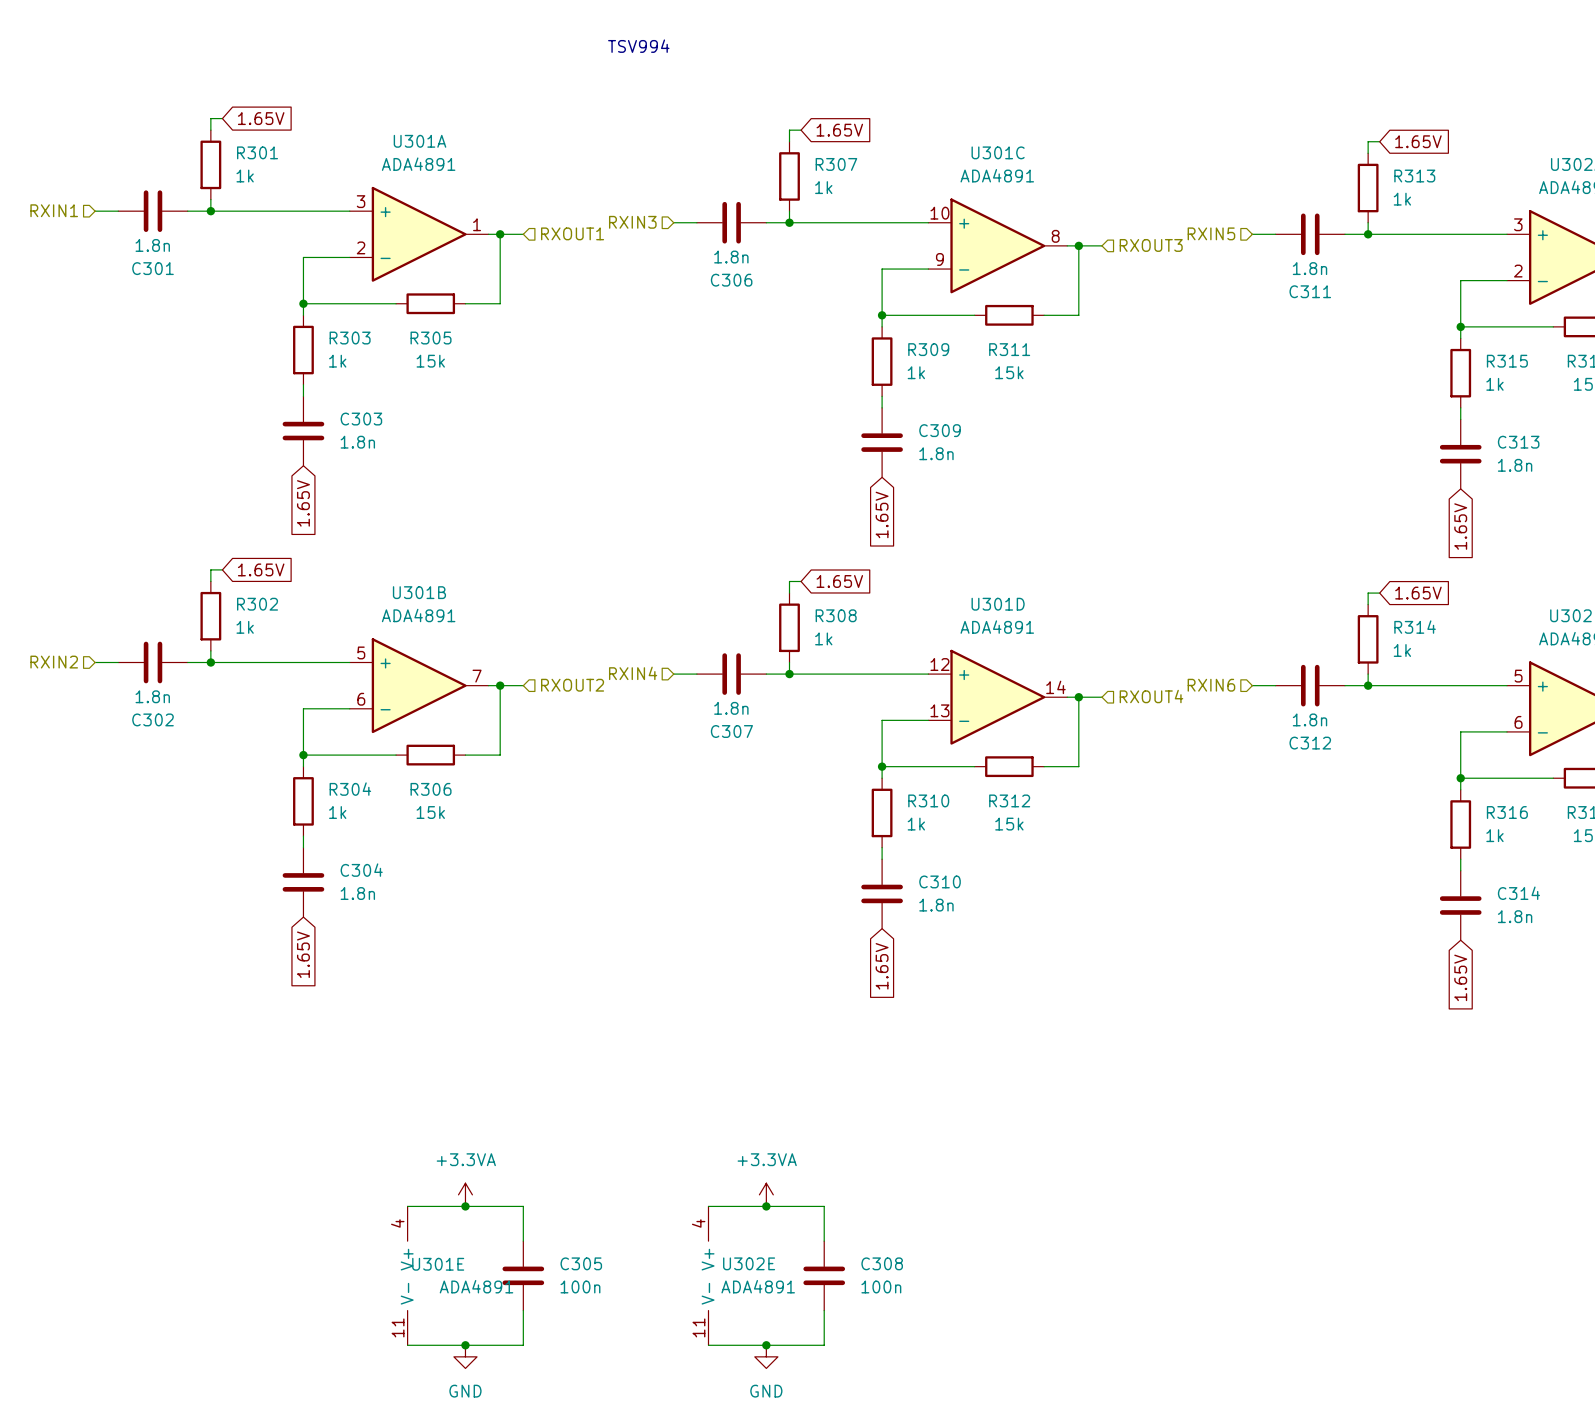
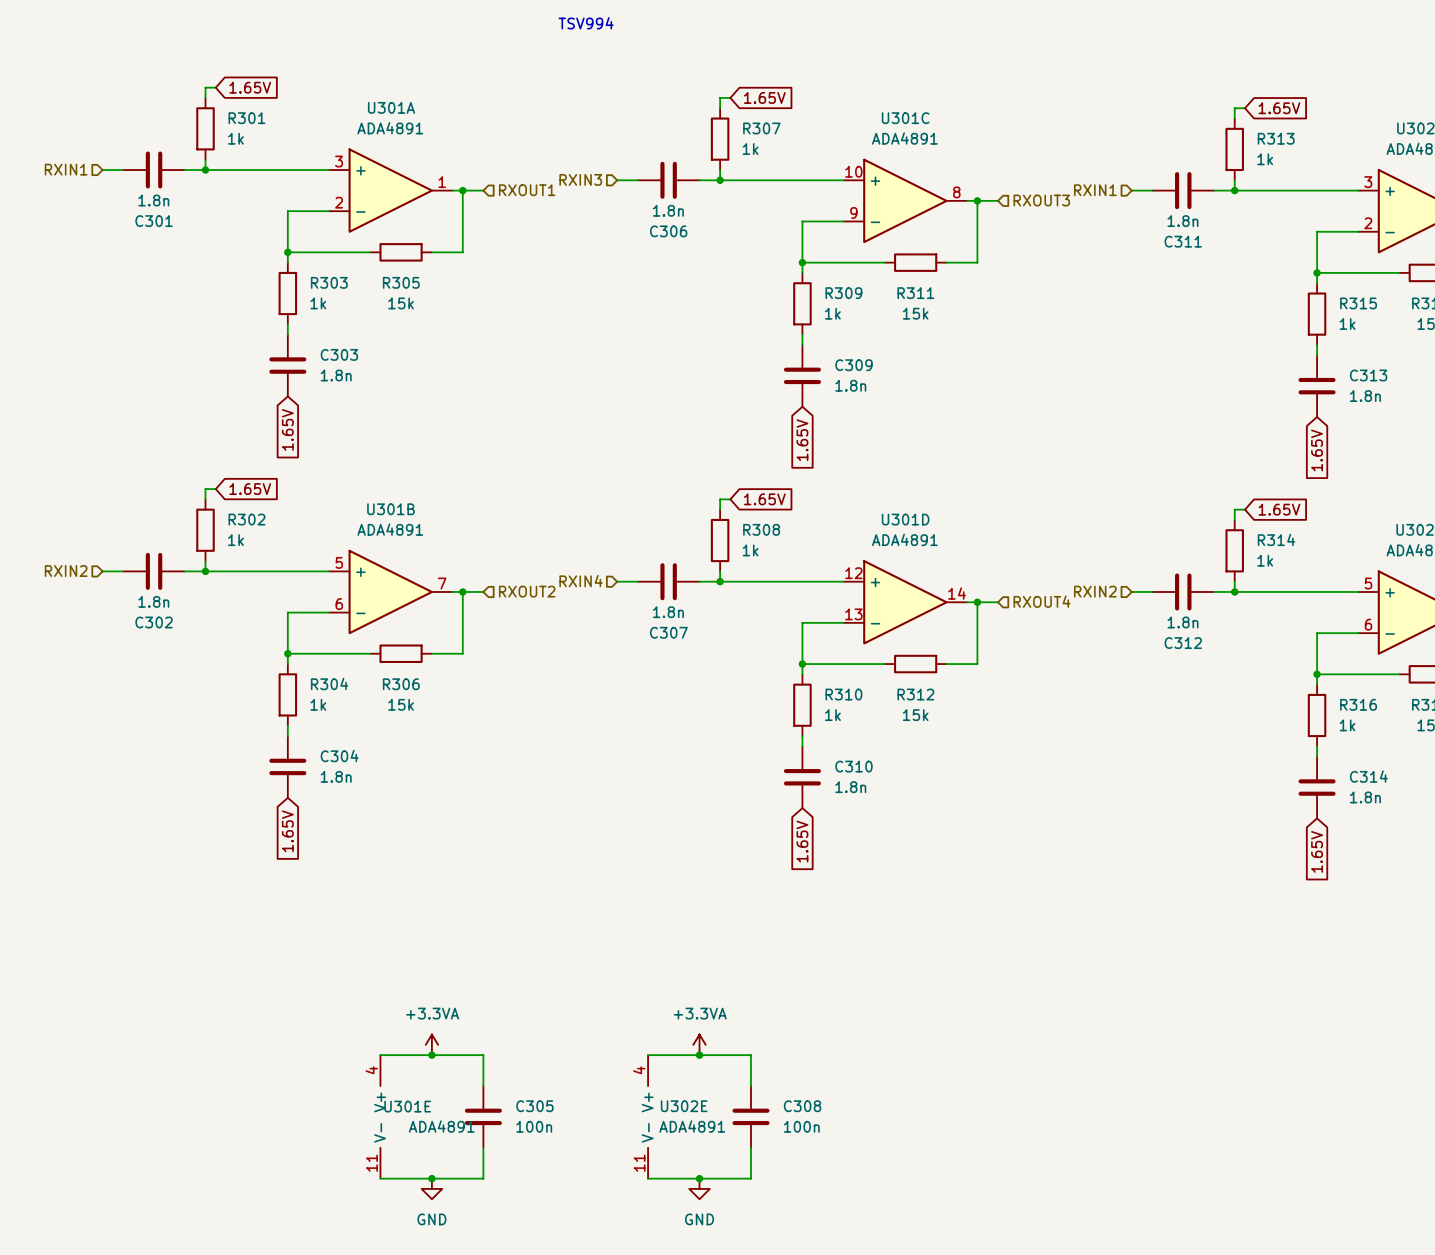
hierarchical label: RXIN5 (1211, 233) -> RXIN1 (1095, 190)
hierarchical label: RXIN6 (1211, 685) -> RXIN2 (1095, 591)

